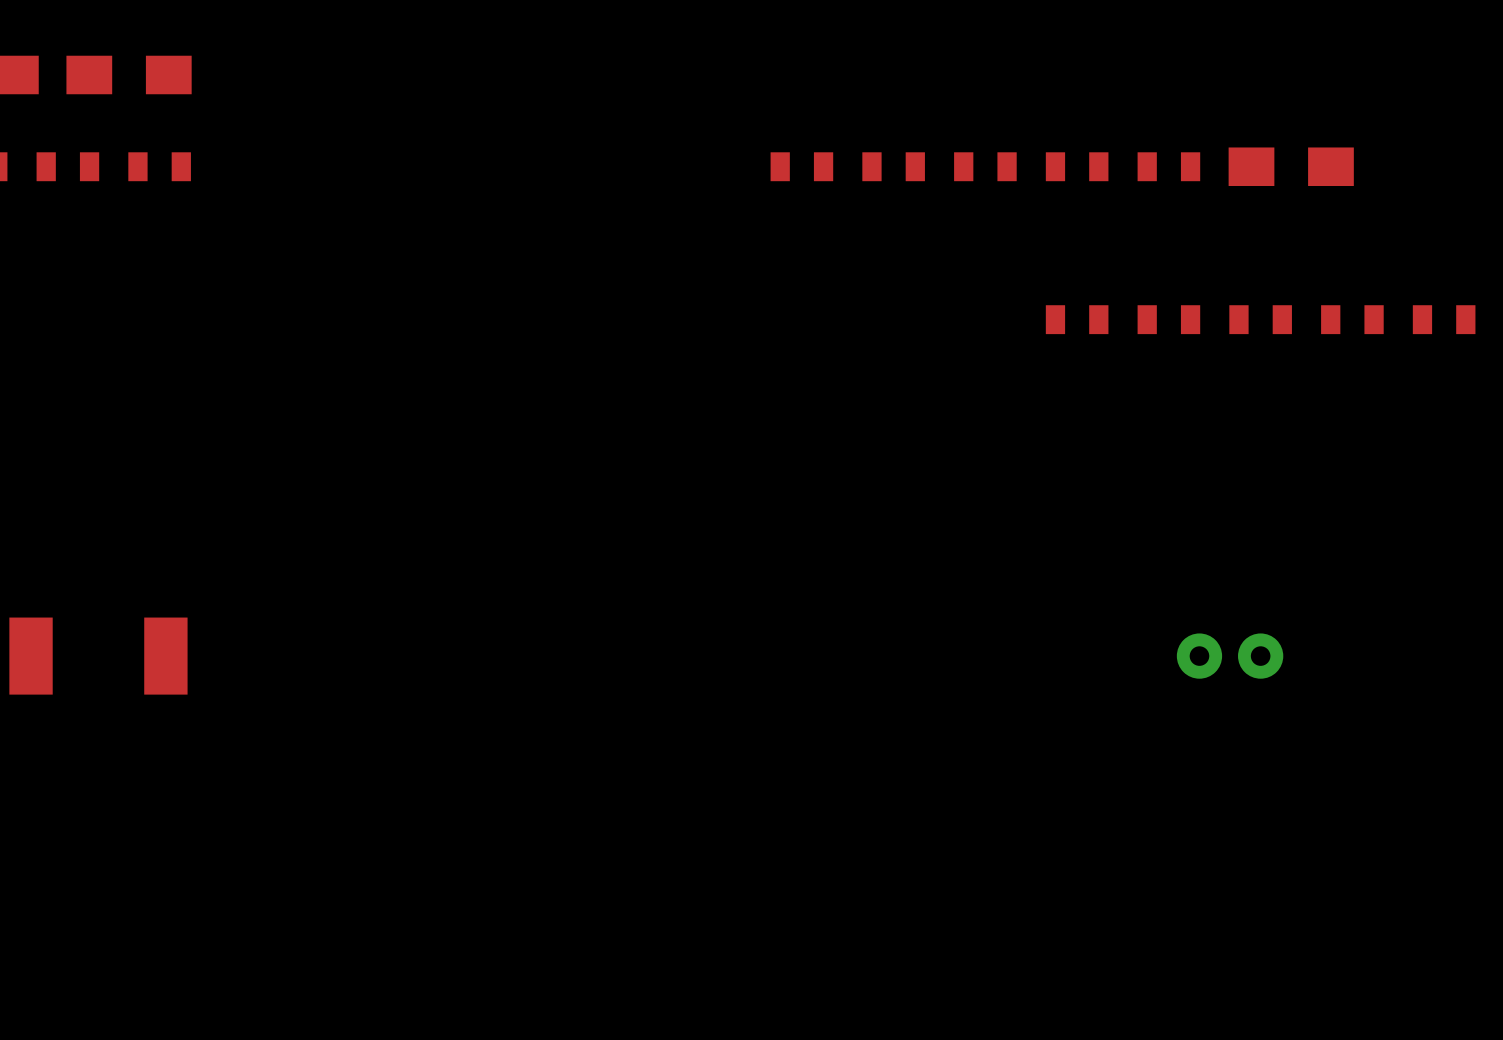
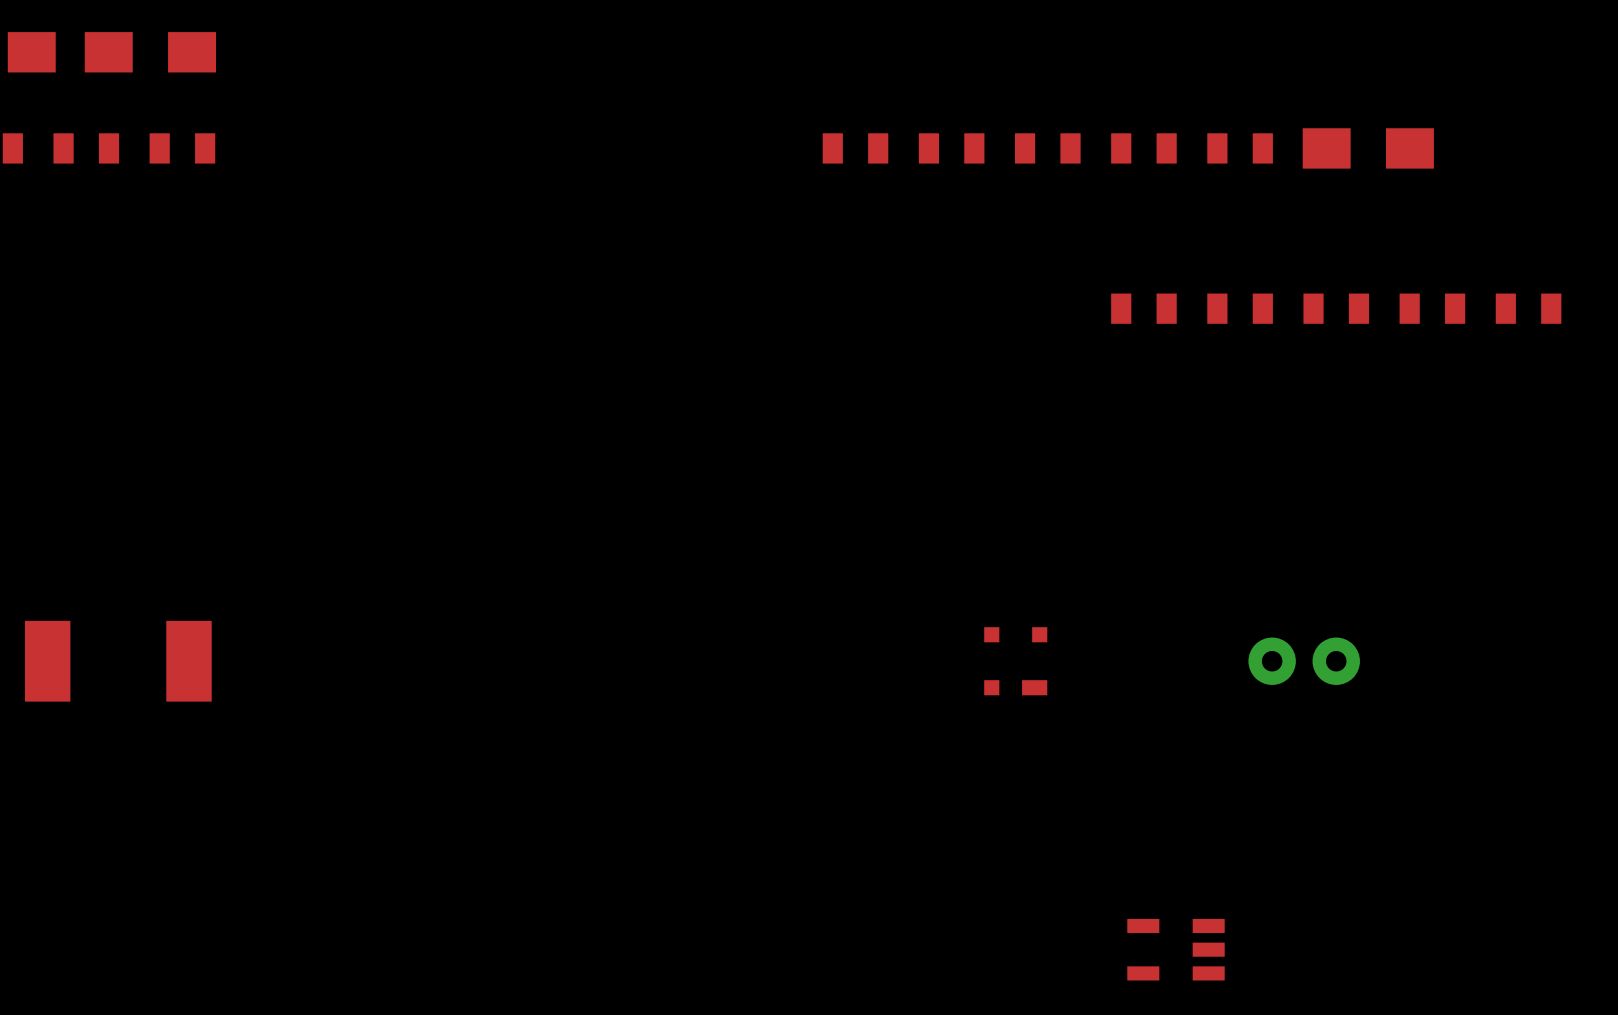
part: none -> (1015, 661)
part: none -> (1175, 949)

